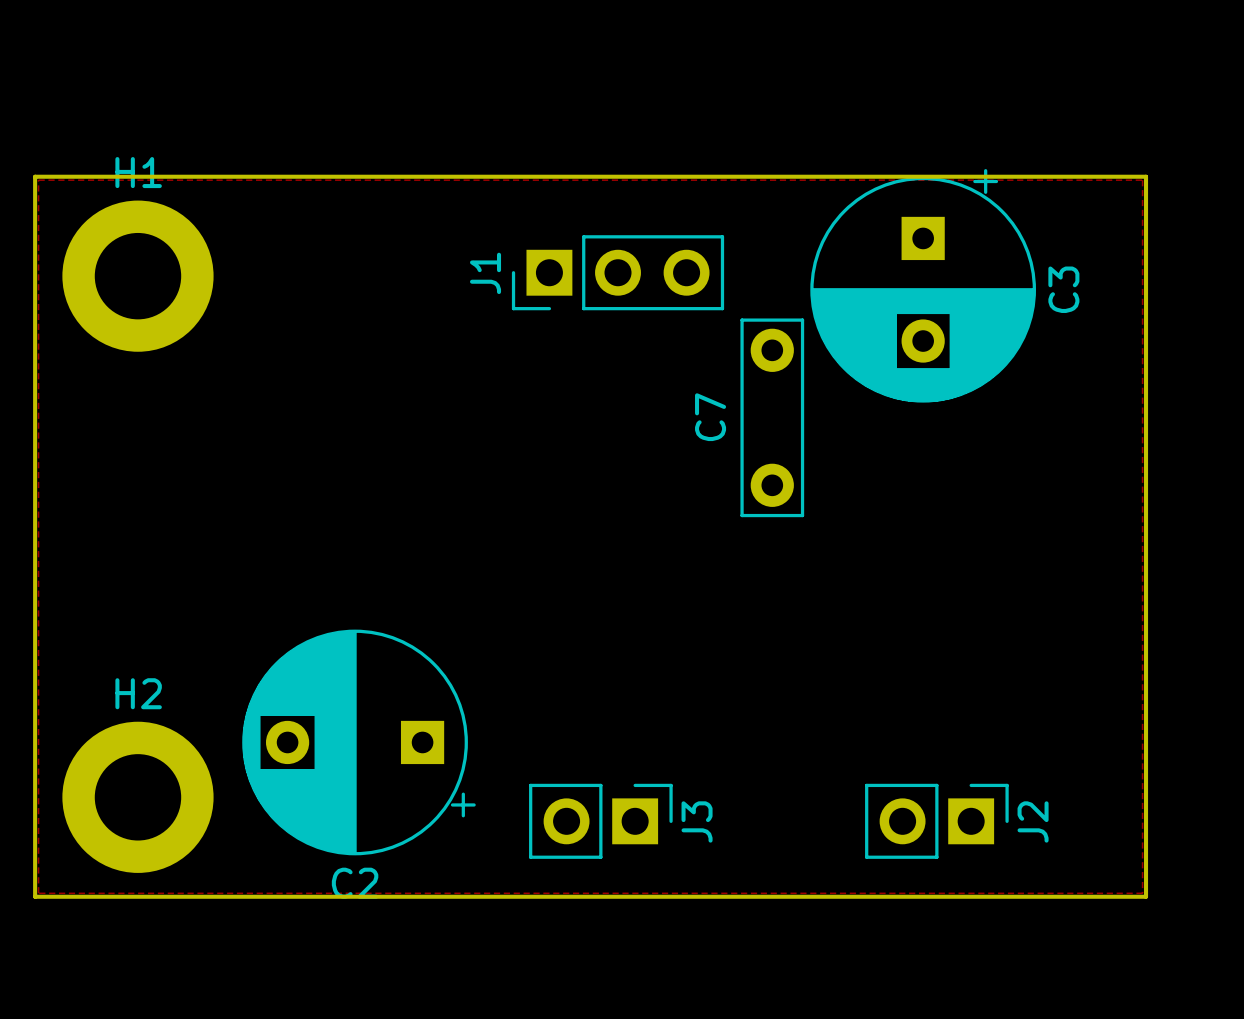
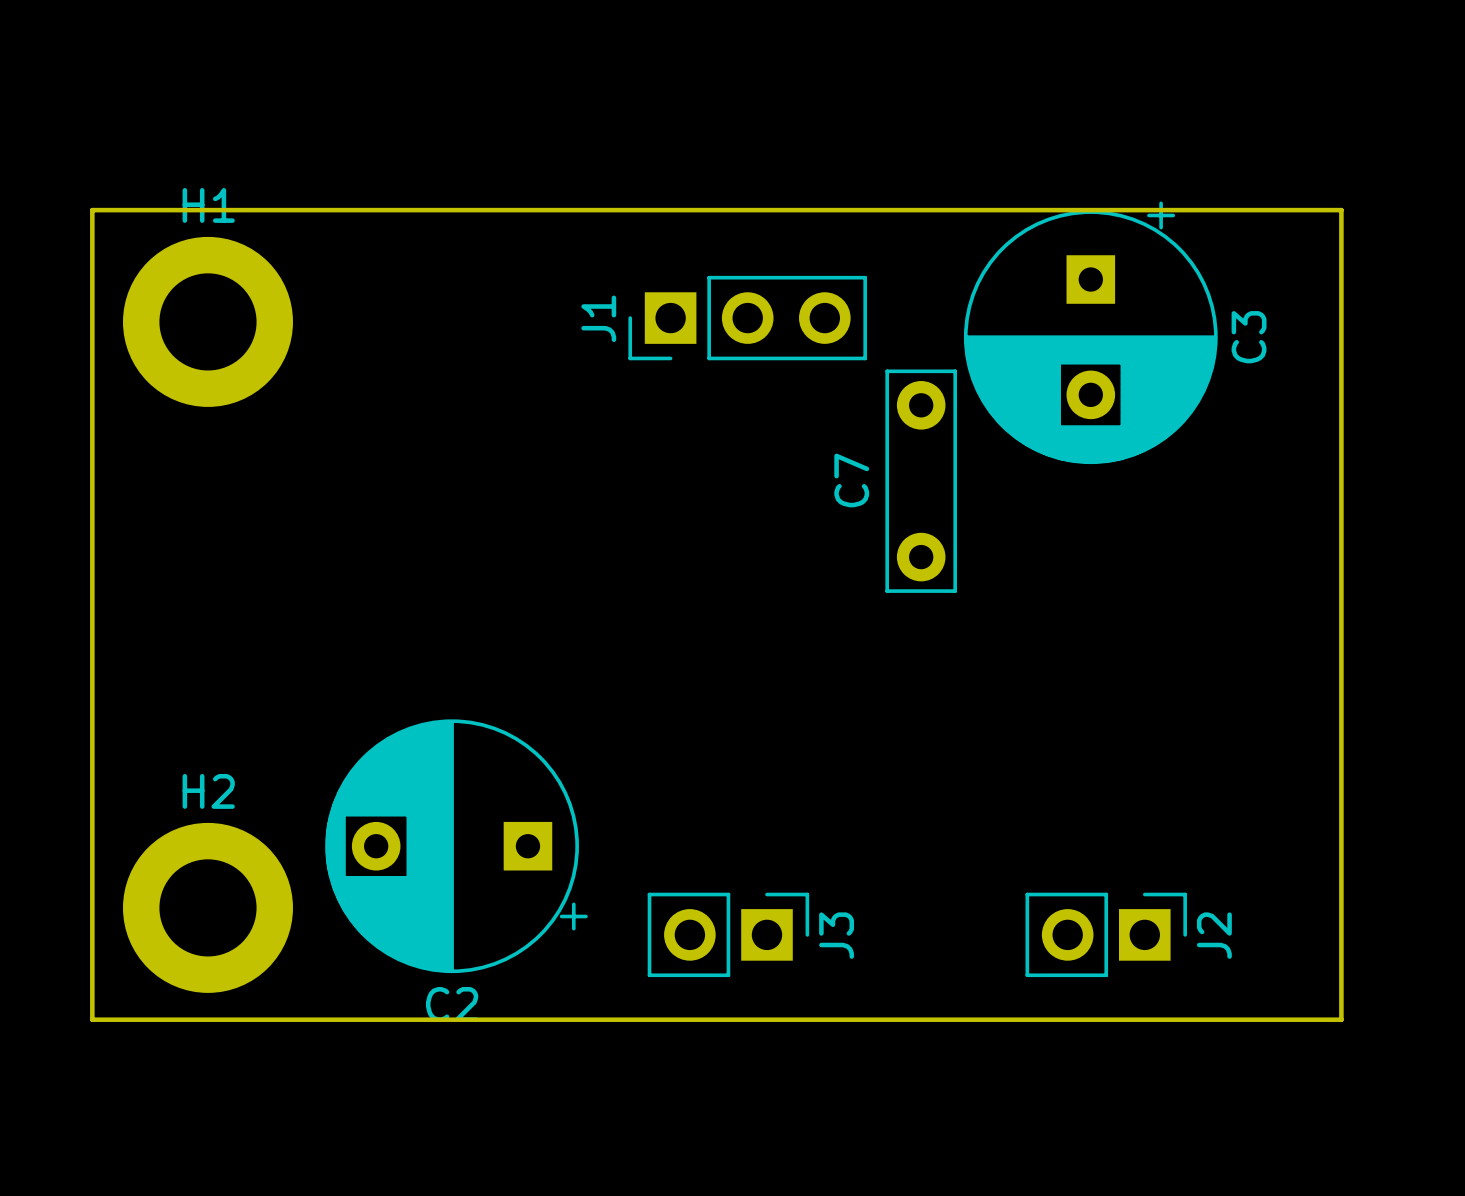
zone outline: (38, 180) (1142, 180) (1142, 893) (38, 893) (38, 180) -> none

